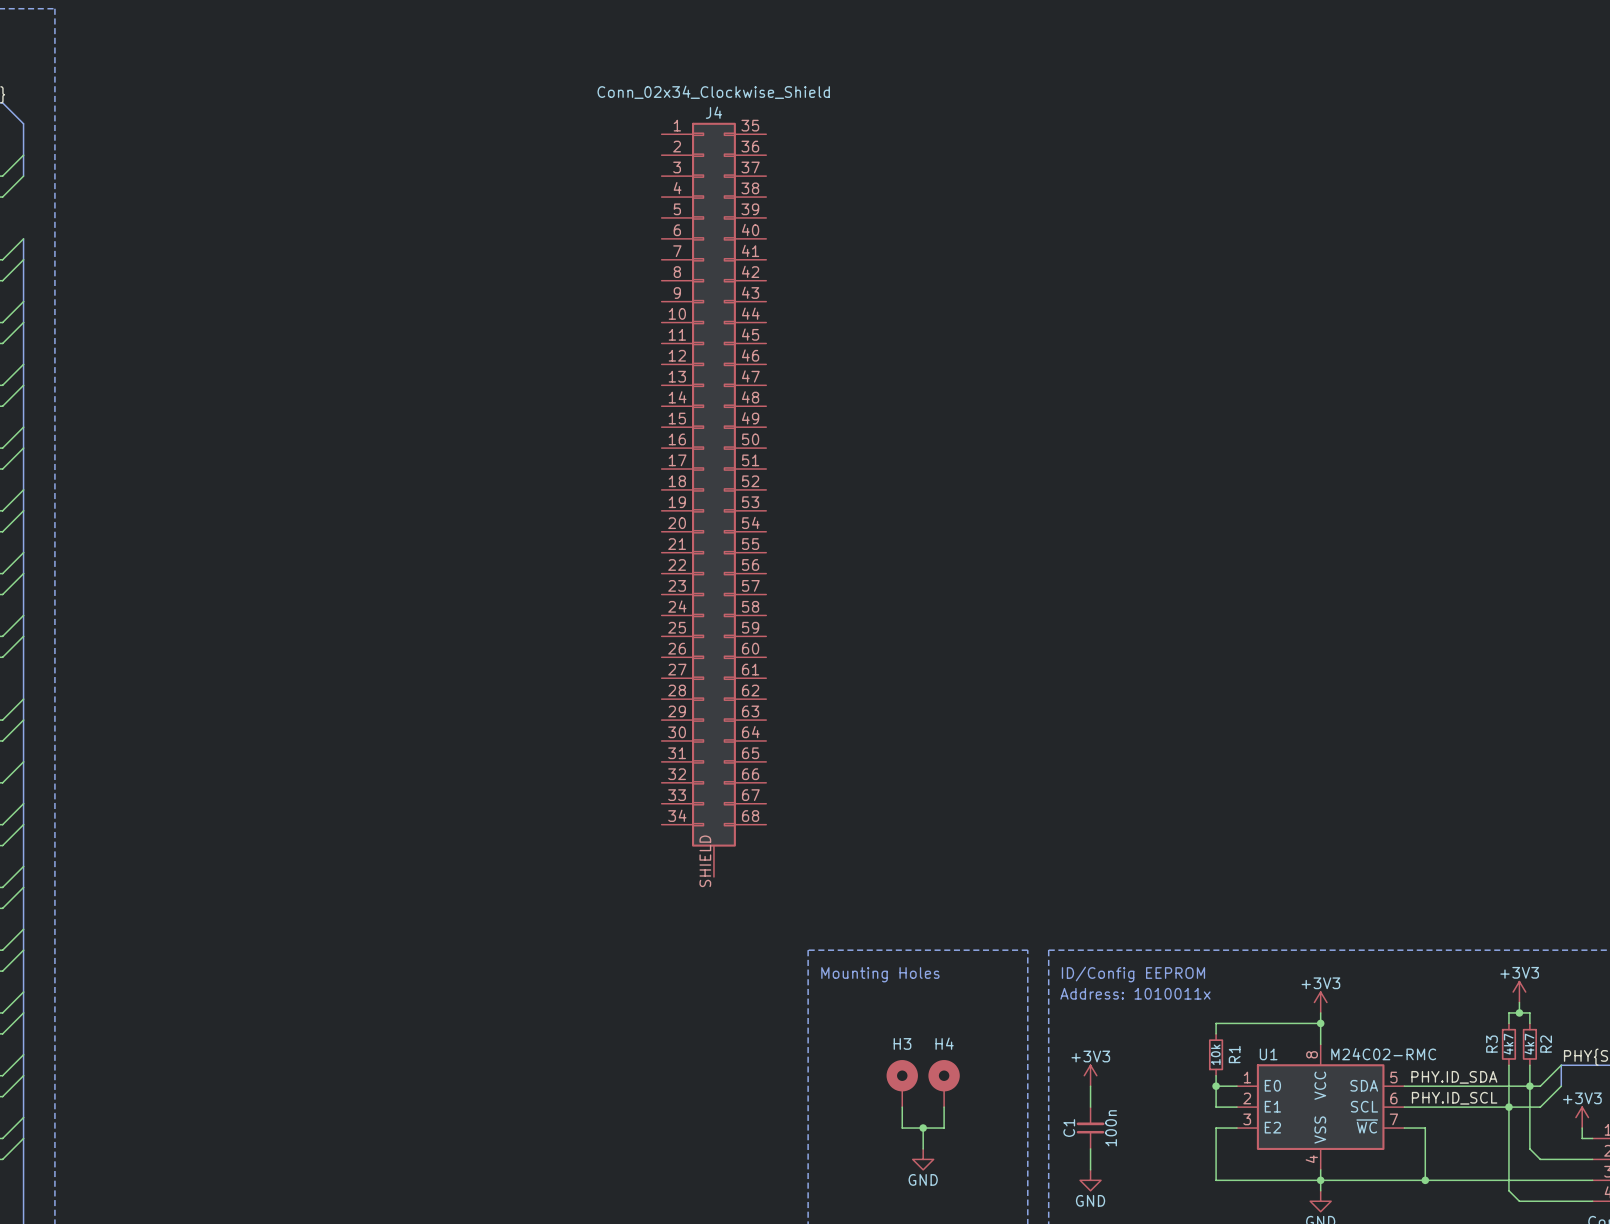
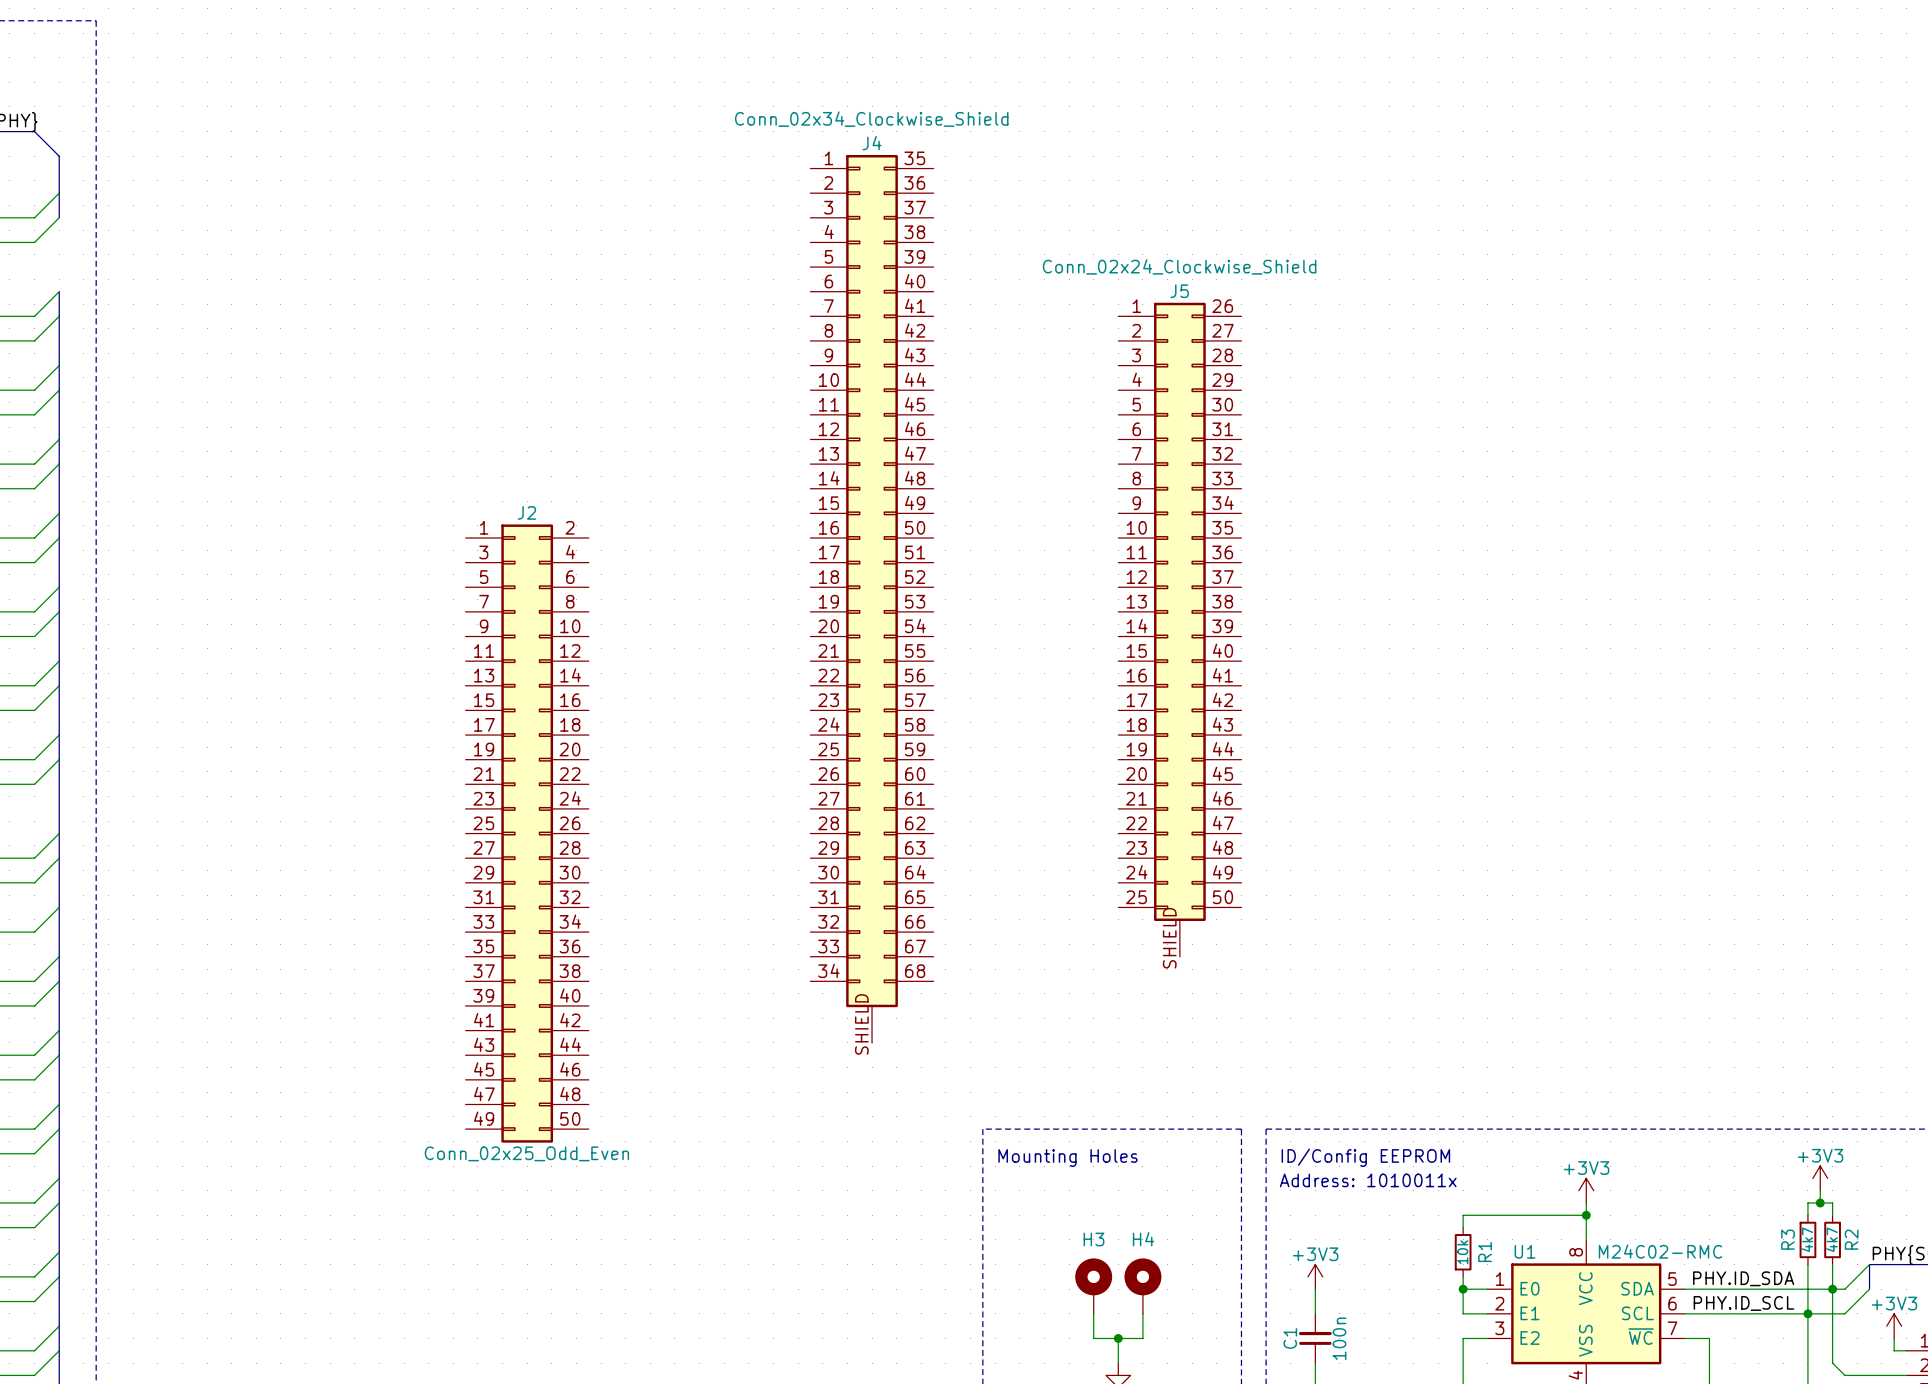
J5: none -> Conn_02x24_Clockwise_Shield (1179, 629)
J2: none -> Conn_02x25_Odd_Even (527, 833)

